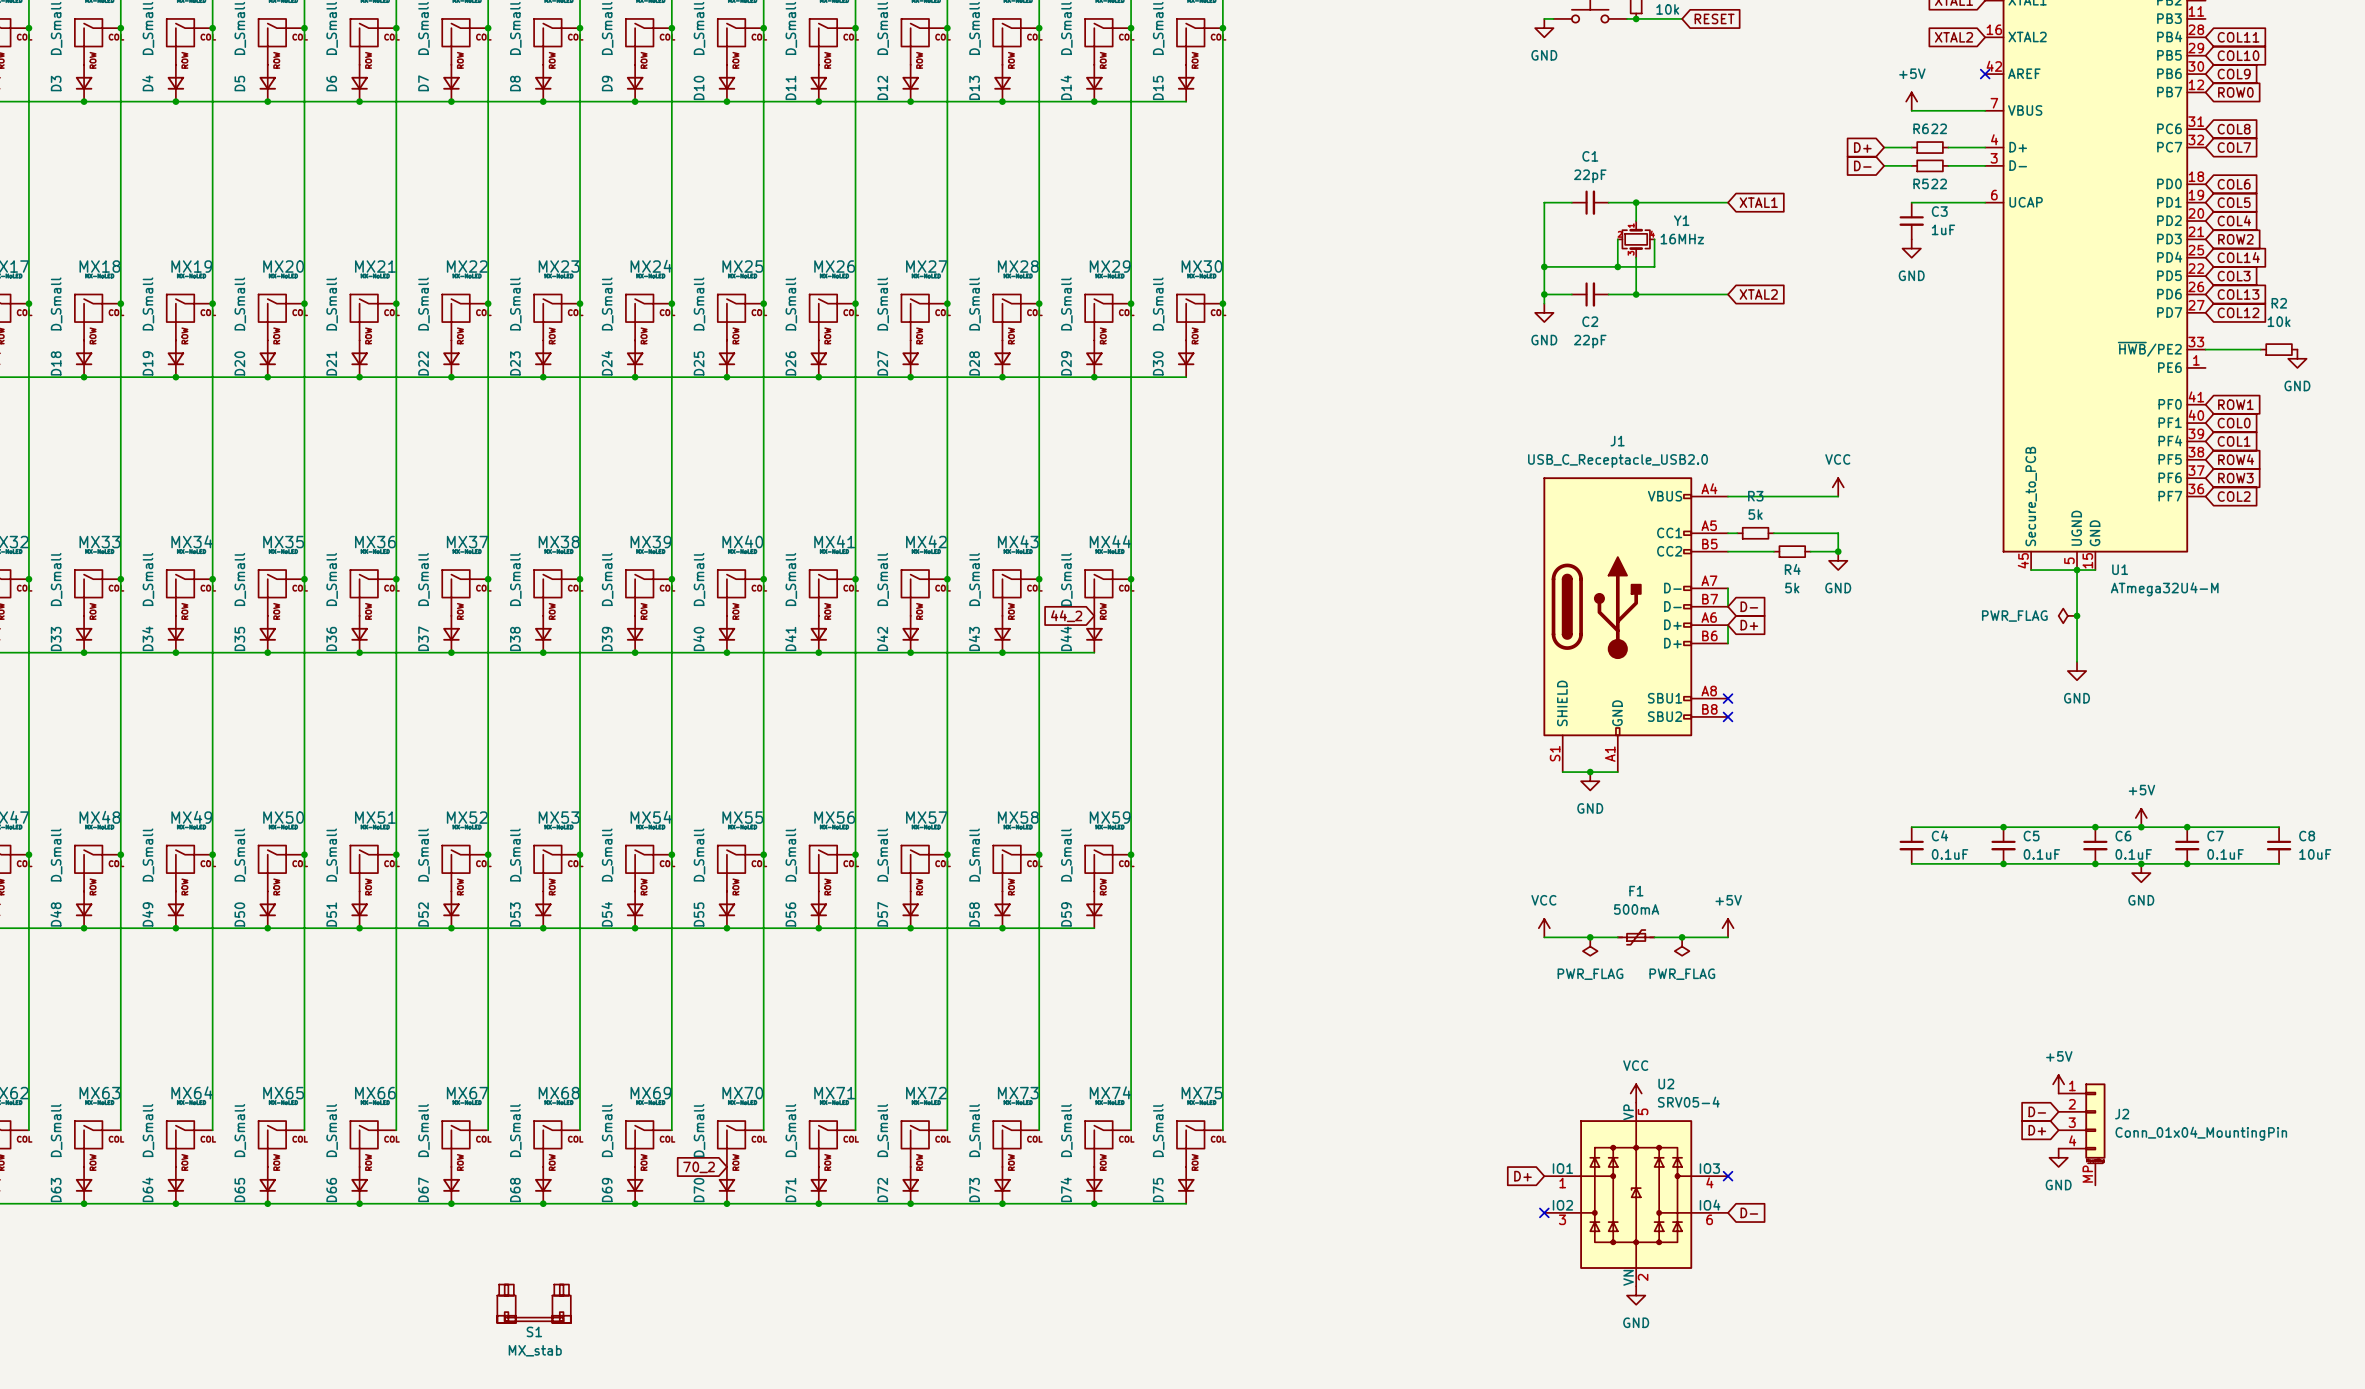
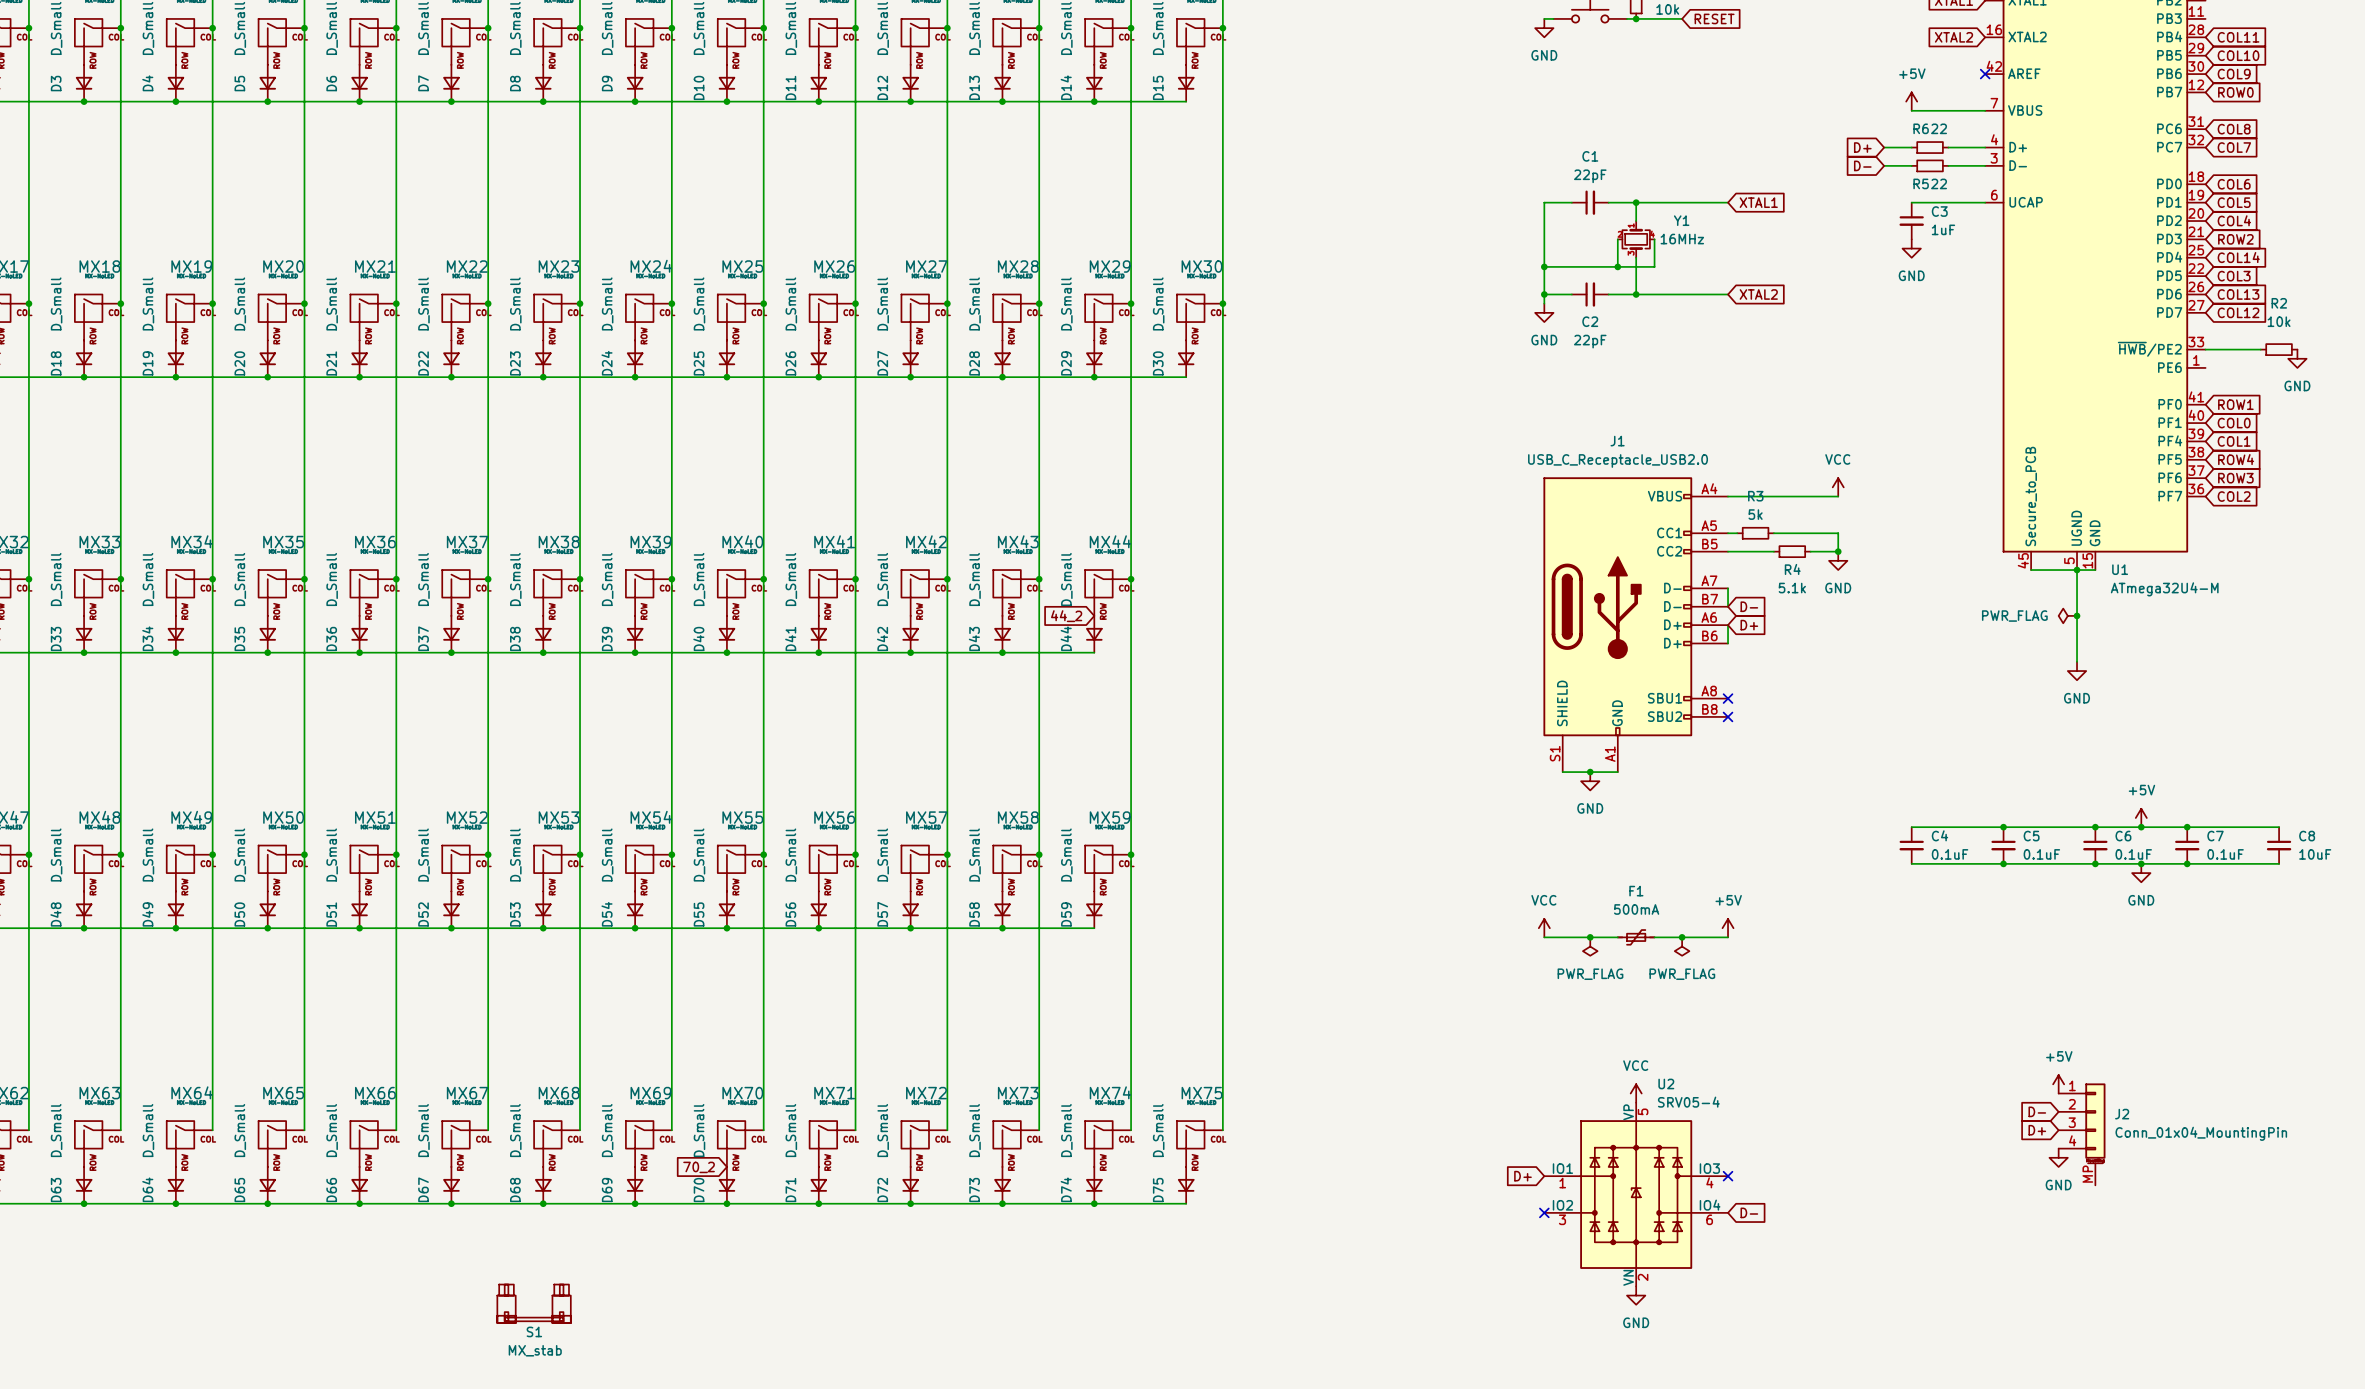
R4 value: 5k (1792, 588) -> 5.1k (1792, 588)

